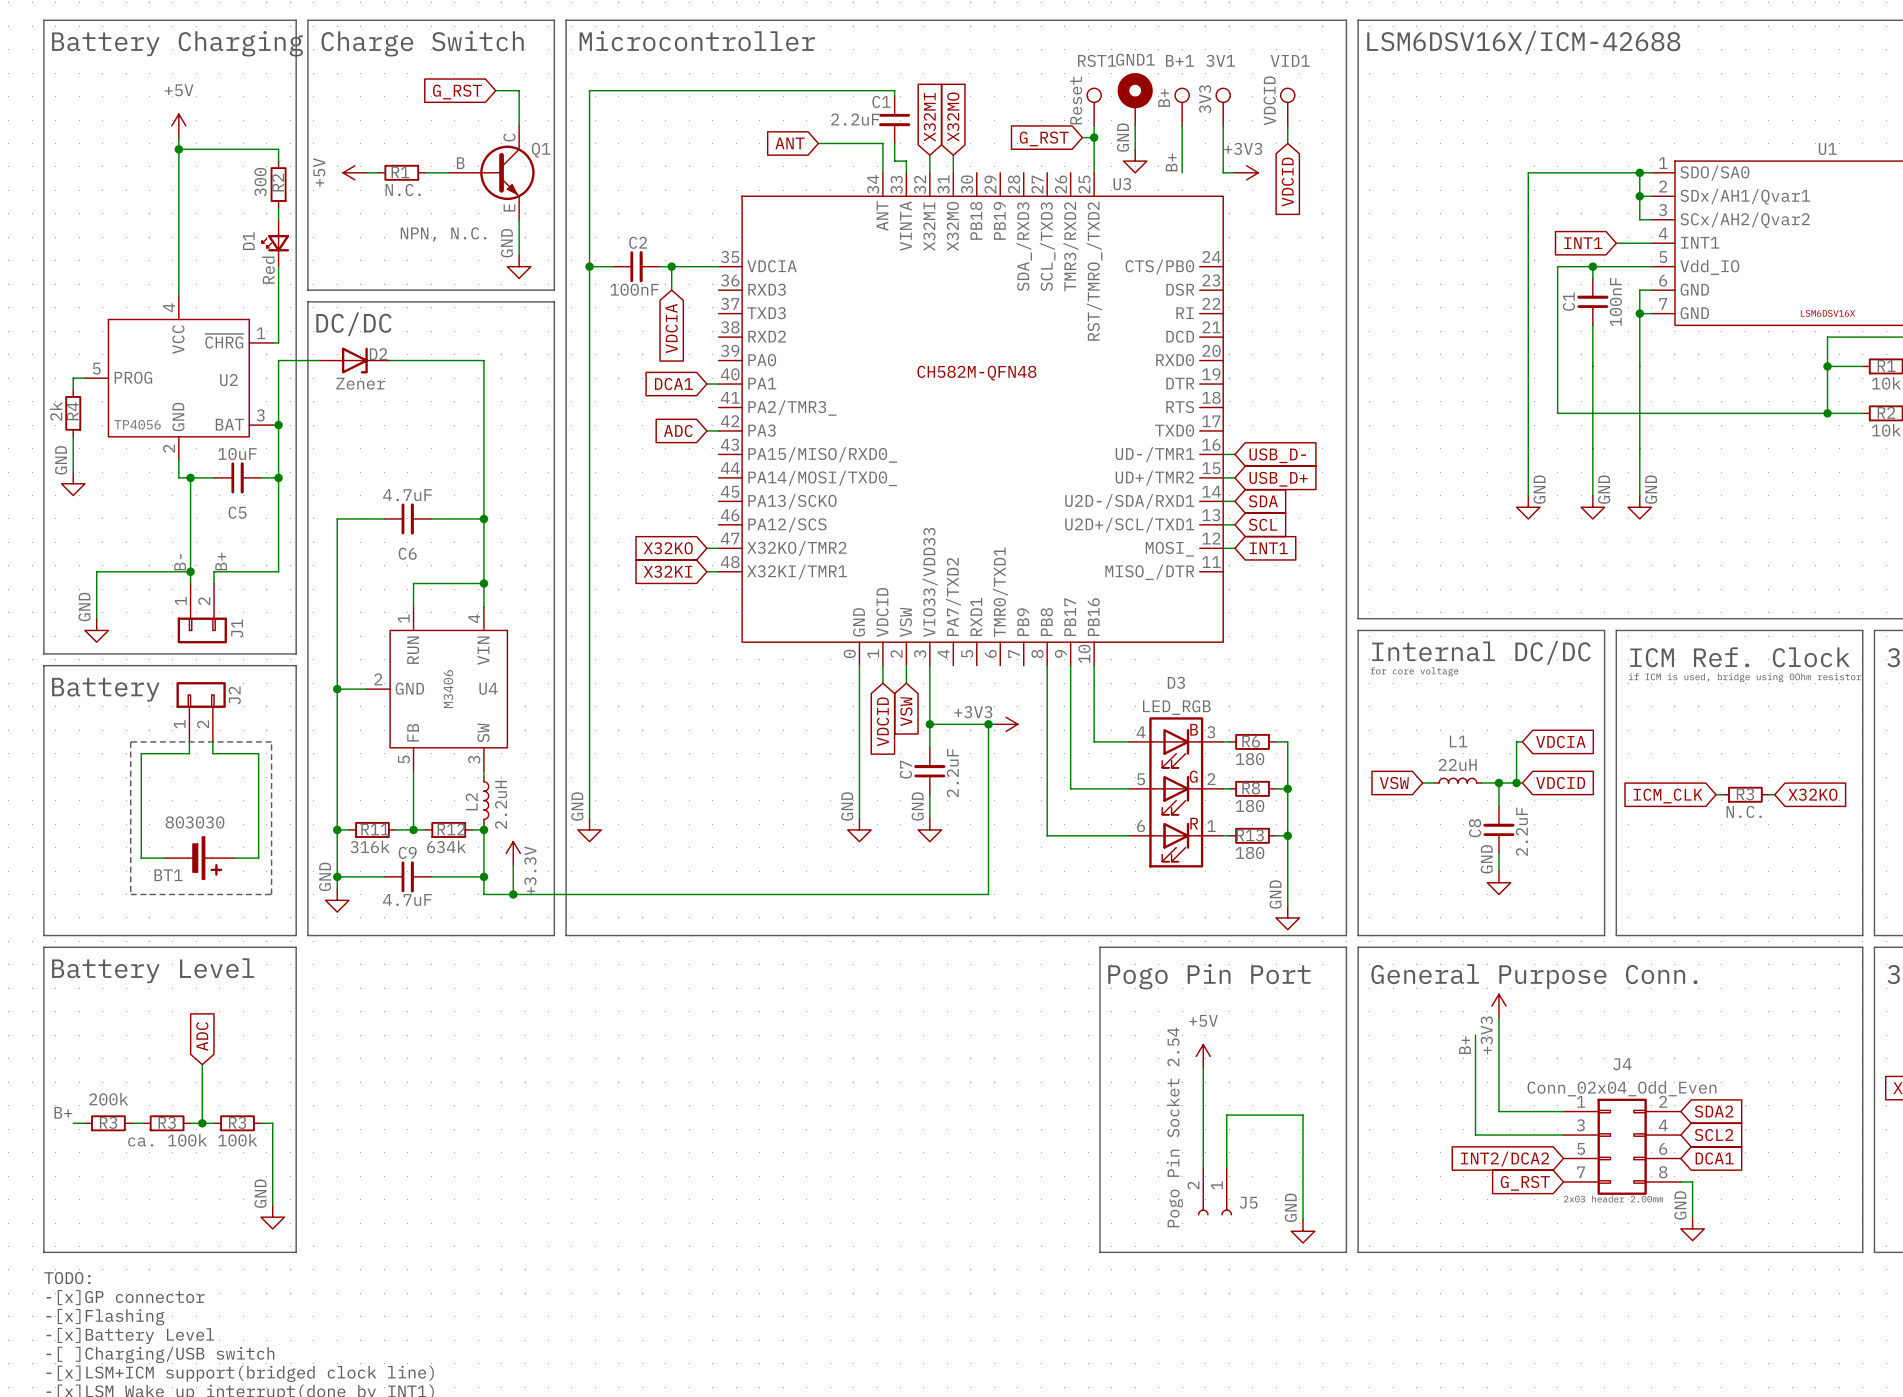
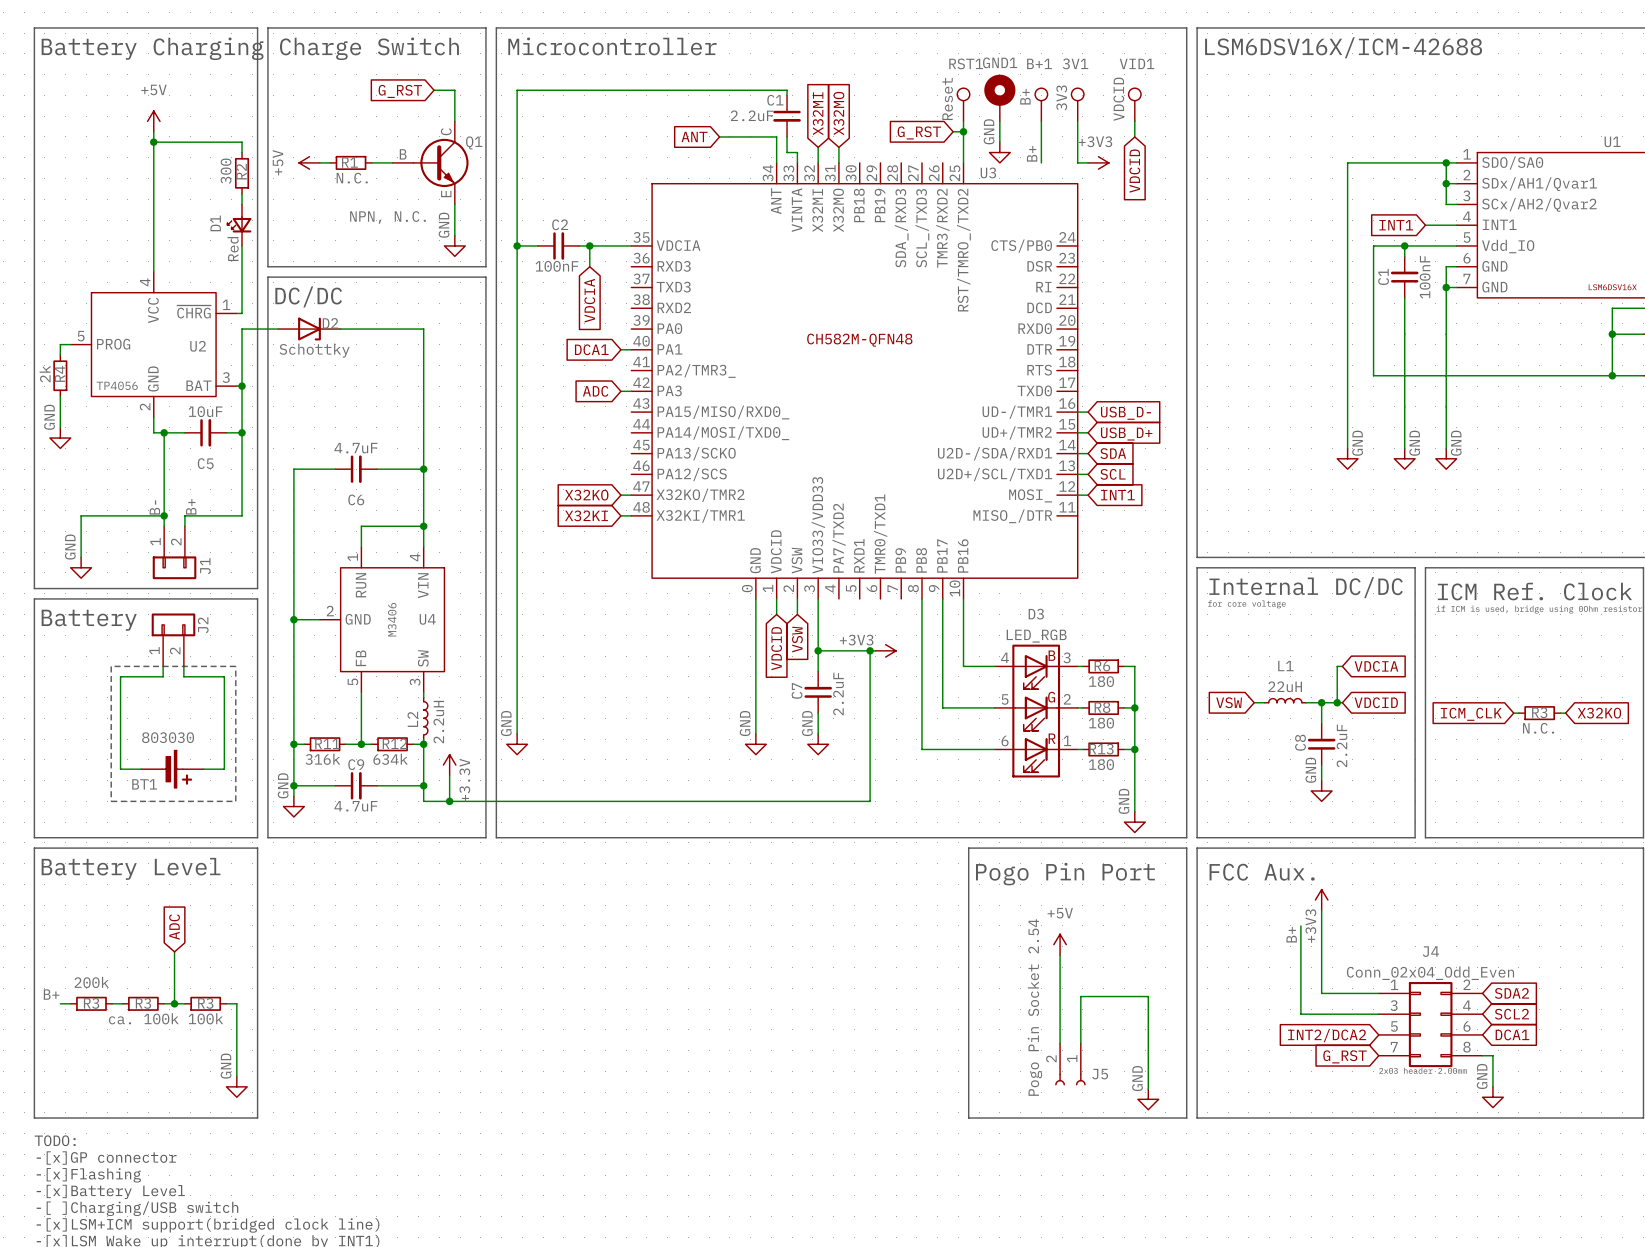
D2 value: Zener (360, 383) -> Schottky (314, 350)
text: General Purpose Conn. (1534, 976) -> FCC Aux. (1262, 872)

